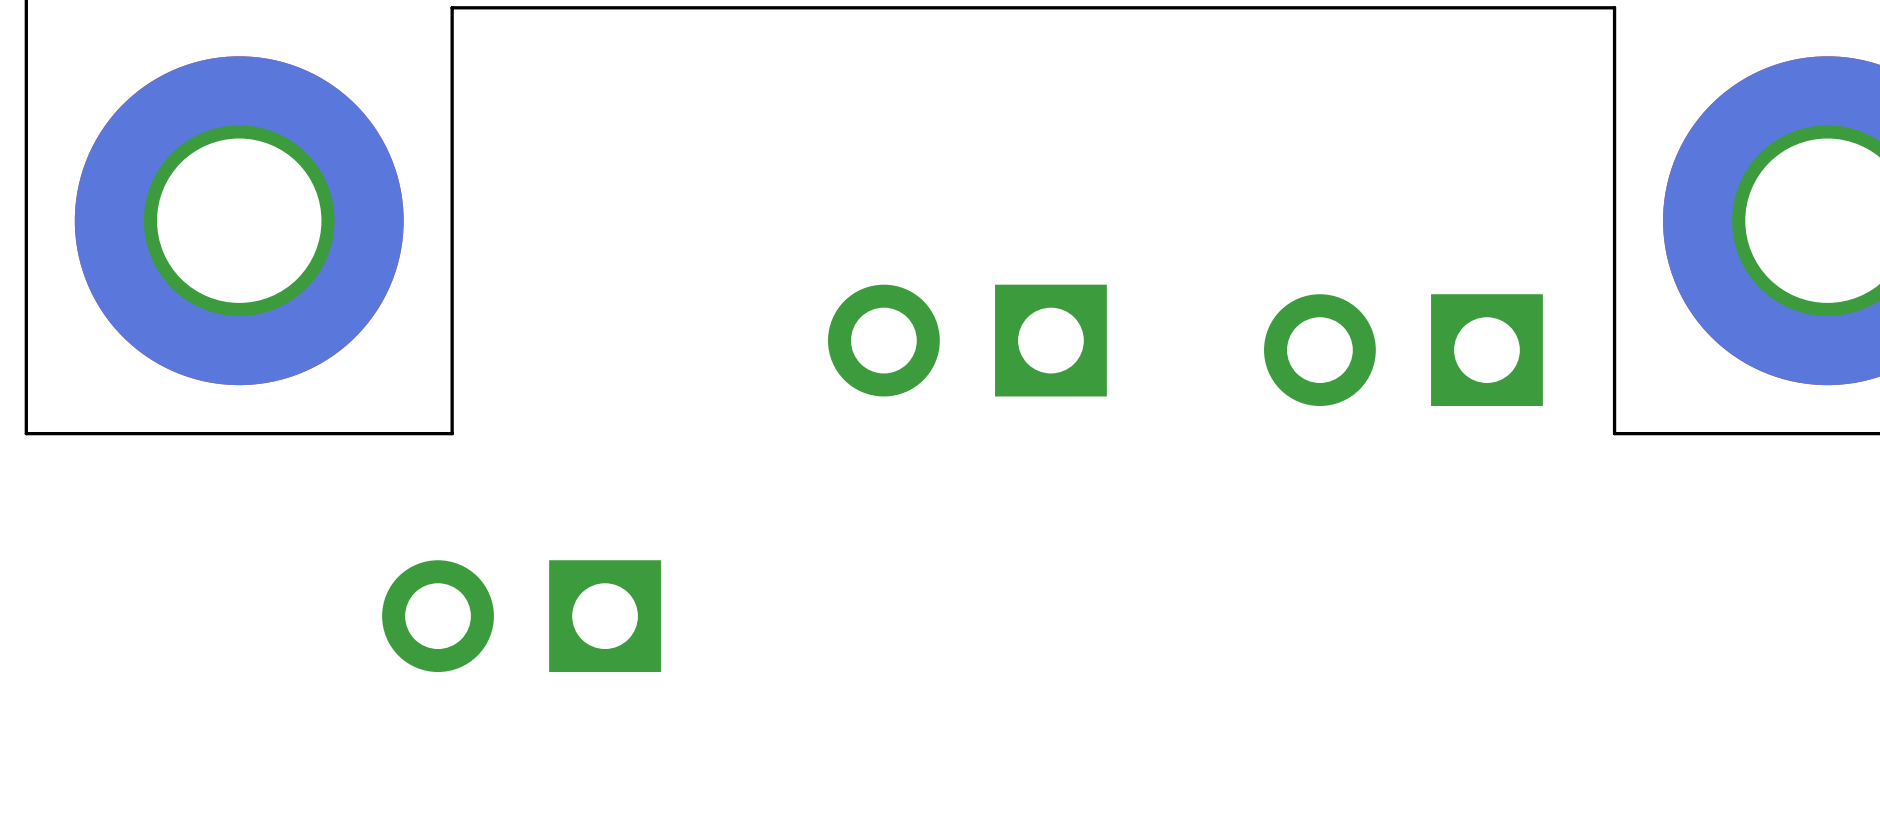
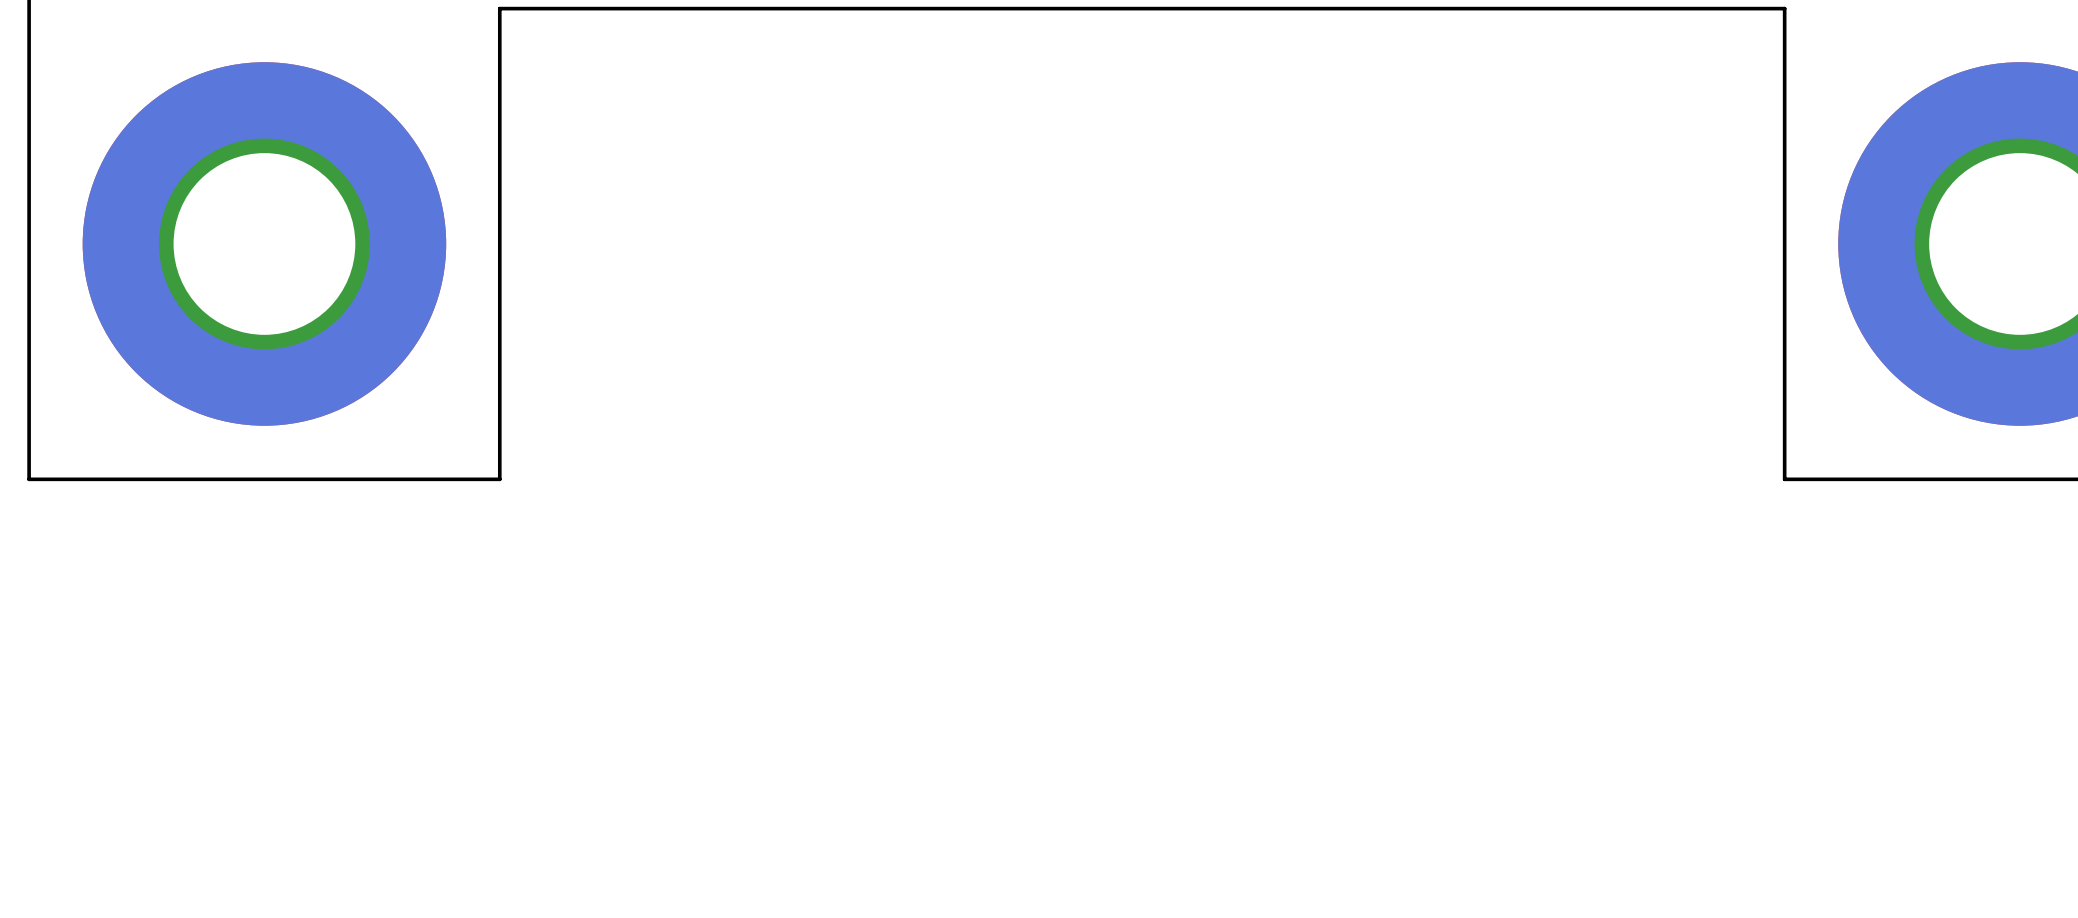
part: (967, 340) -> none
part: (1403, 350) -> none
part: (521, 616) -> none

